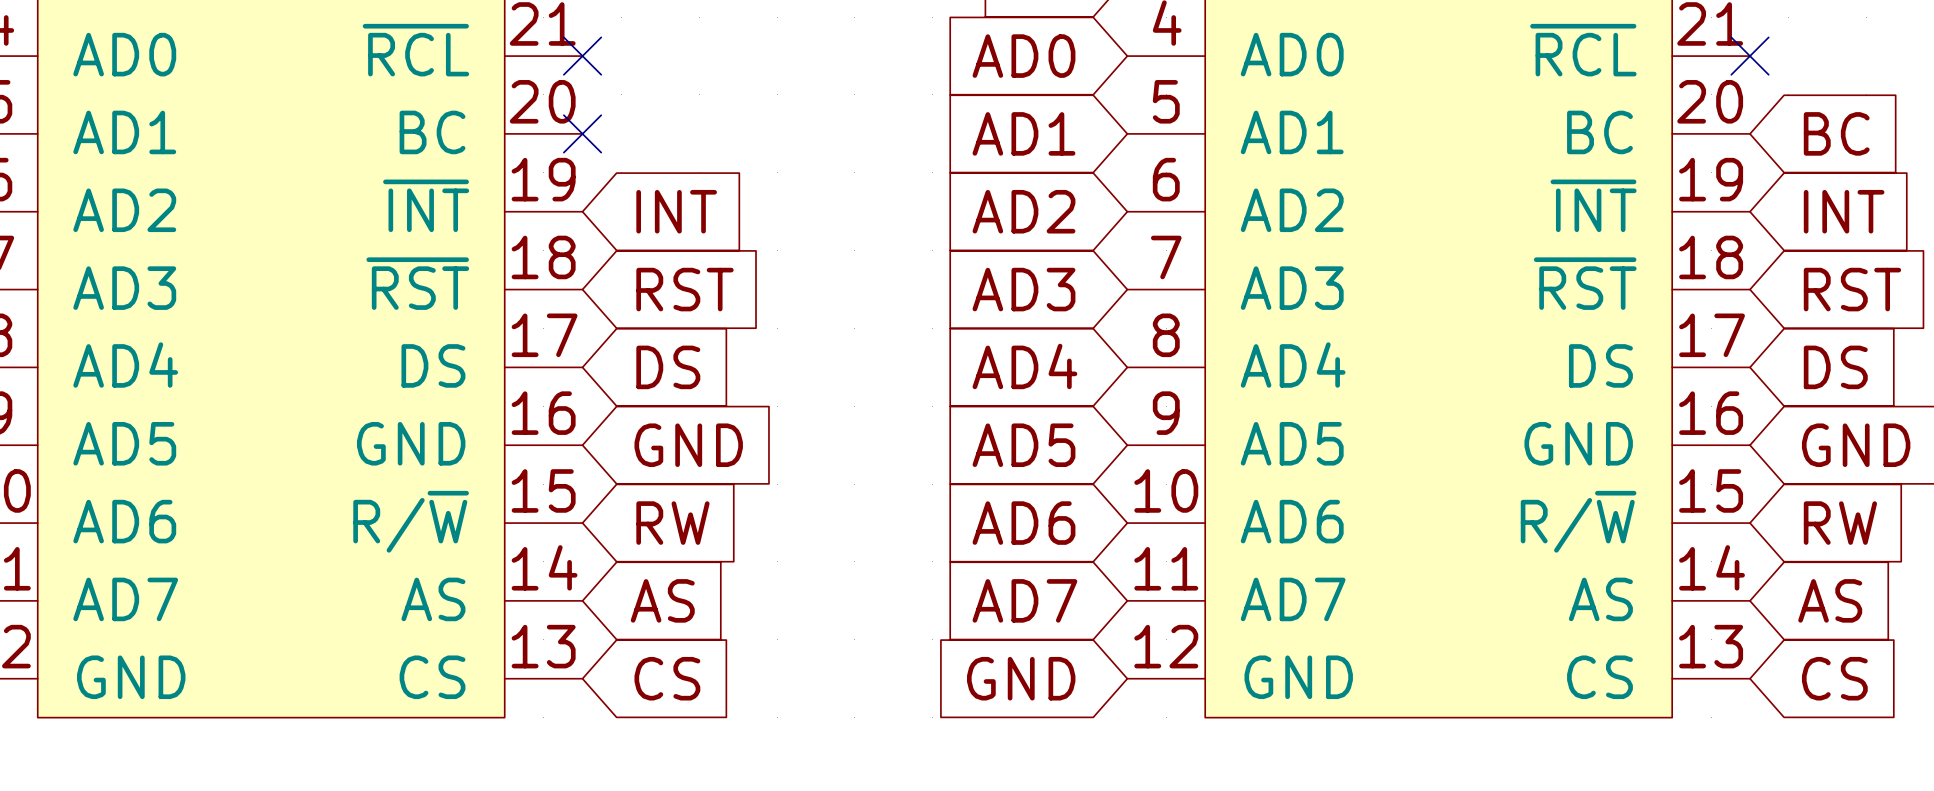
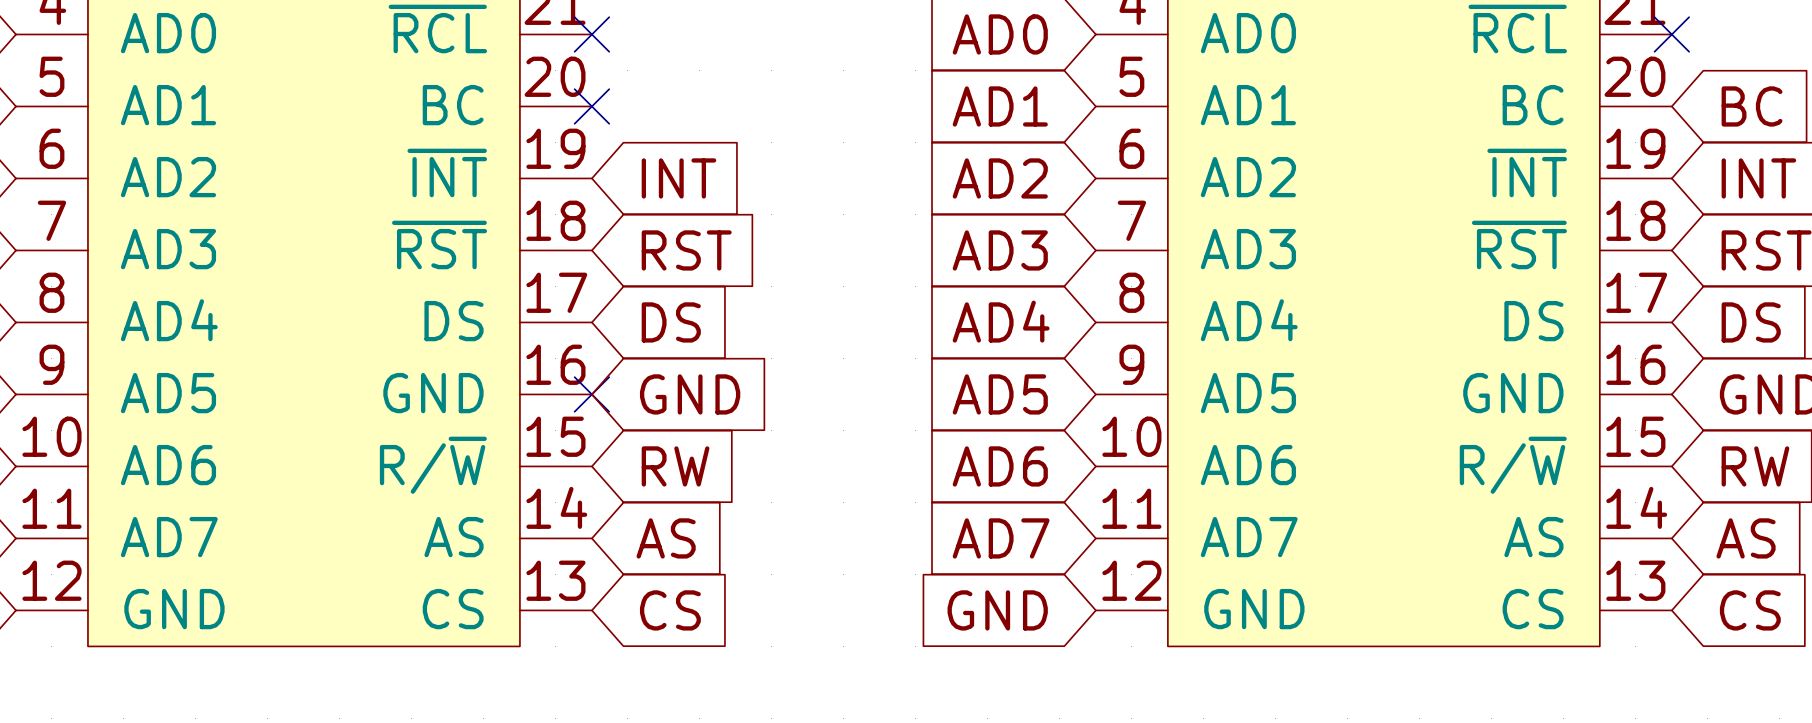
no-connect mark: none -> (591, 394)

